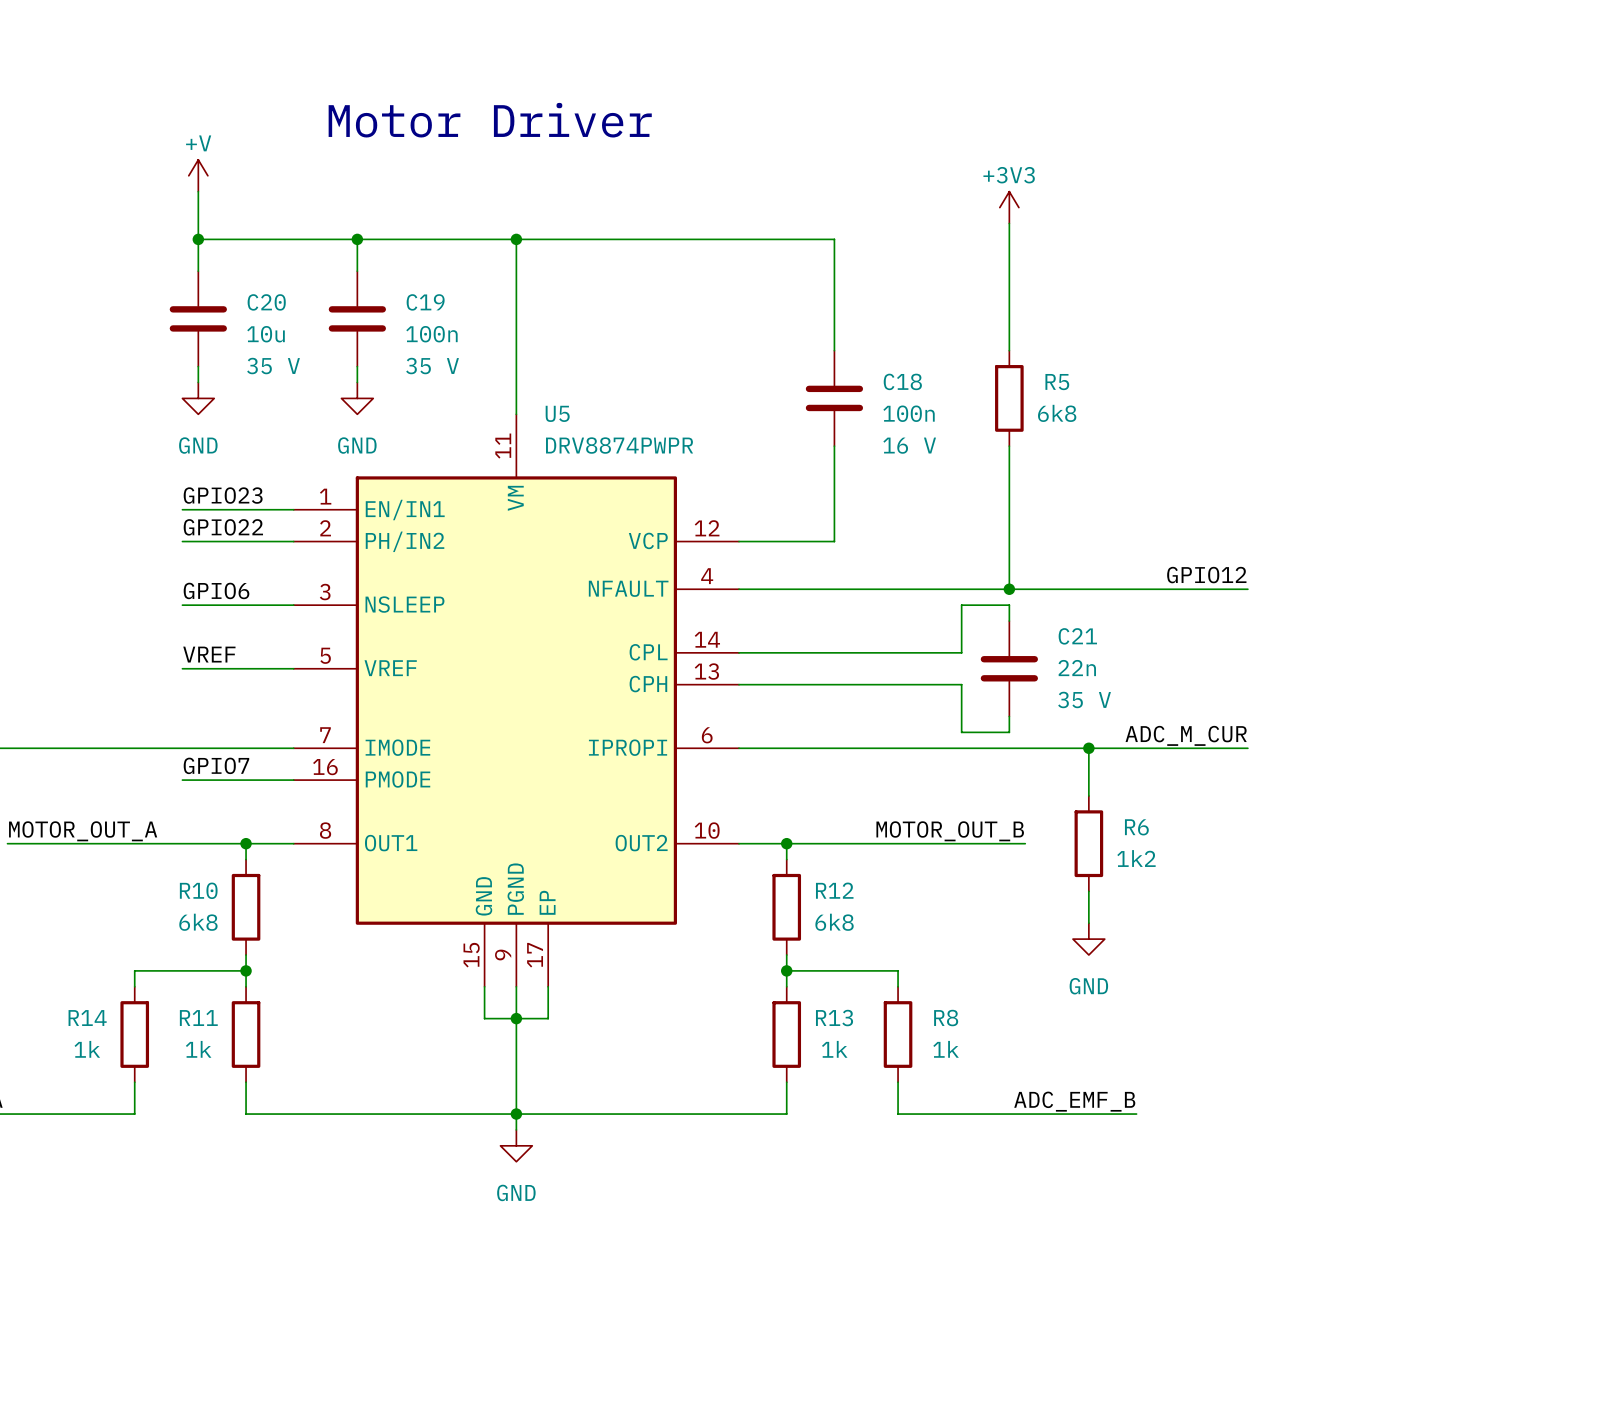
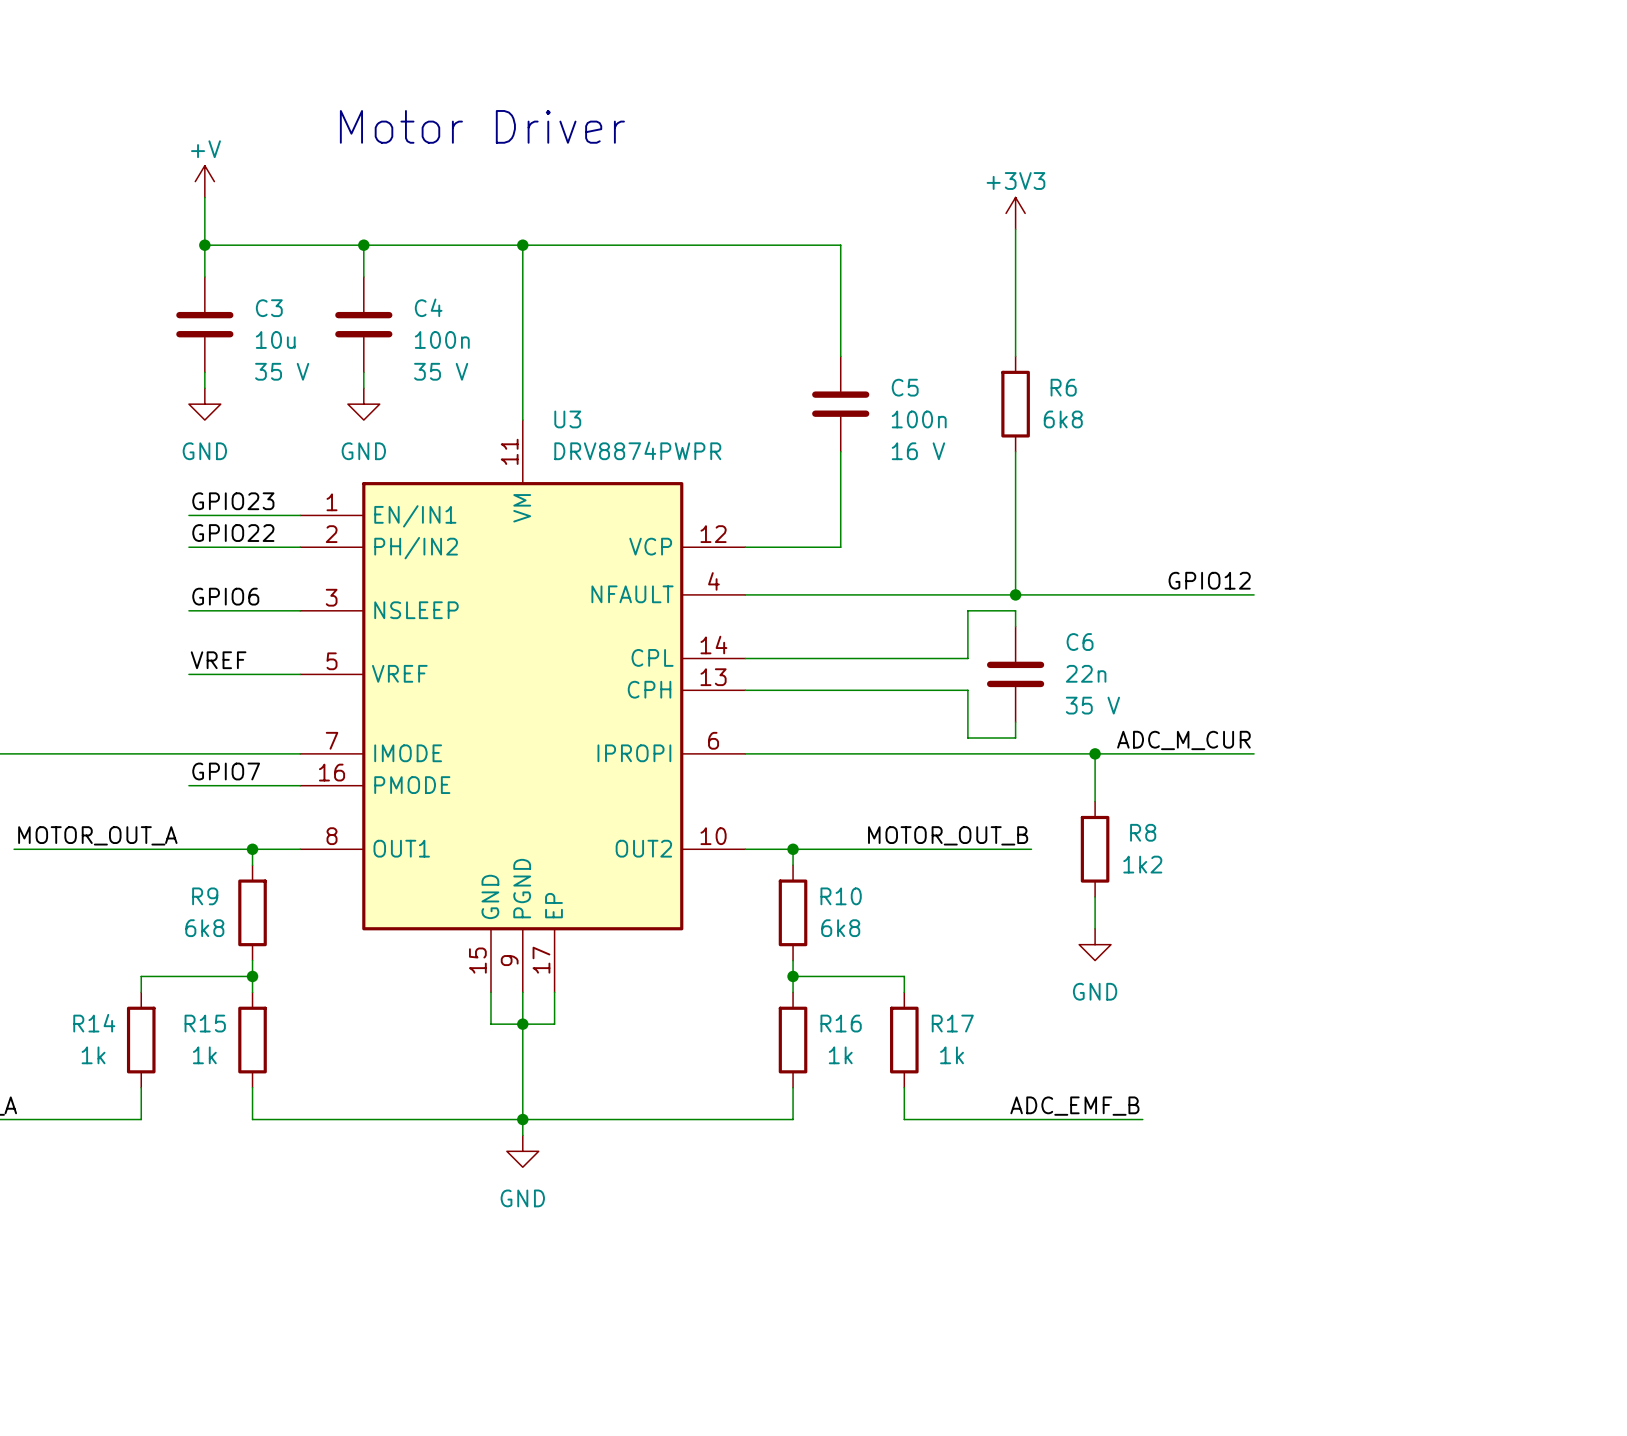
C20 name: C20 (266, 302) -> C3 (269, 308)
C19 name: C19 (425, 302) -> C4 (428, 307)
C18 name: C18 (902, 381) -> C5 (905, 387)
R5 name: R5 (1057, 382) -> R6 (1063, 387)
U5 name: U5 (557, 413) -> U3 (567, 419)
C21 name: C21 (1077, 636) -> C6 (1080, 642)
R6 name: R6 (1136, 827) -> R8 (1143, 832)
R10 name: R10 (198, 890) -> R9 (205, 896)
R12 name: R12 (834, 890) -> R10 (841, 896)
R11 name: R11 (198, 1018) -> R15 (205, 1023)
R13 name: R13 (834, 1018) -> R16 (841, 1023)
R8 name: R8 (946, 1018) -> R17 (952, 1023)

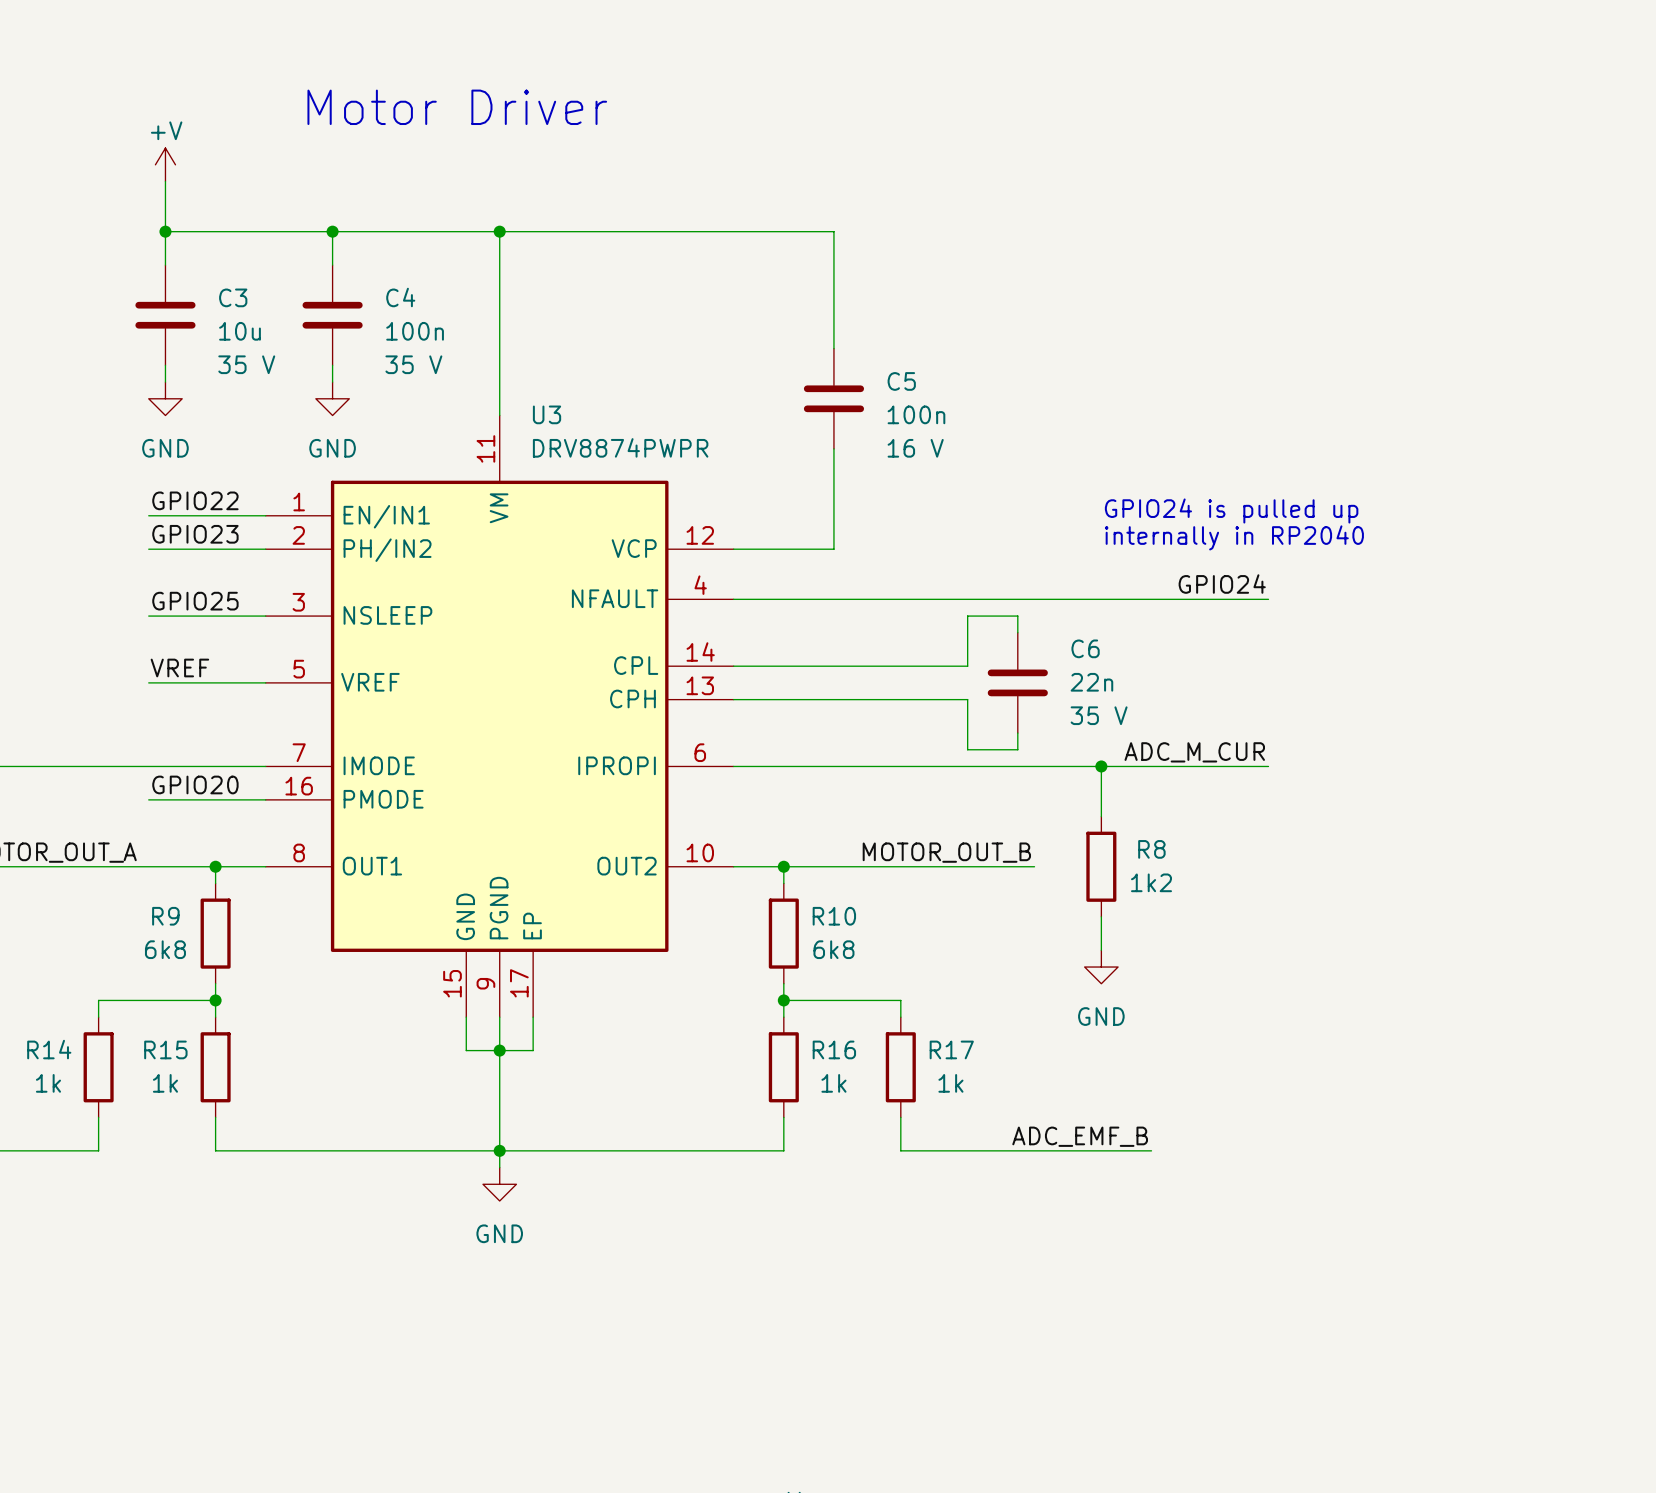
power symbol: +3V3 (1015, 213) -> none
wire: (1015, 229) (1015, 356) -> none
R6: 6k8 (1015, 404) -> none
wire: (1015, 451) (1015, 594) -> none
label: GPIO23 (233, 501) -> GPIO22 (195, 500)
text: none -> GPIO24 is pulled up (1231, 510)
label: GPIO22 (233, 533) -> GPIO23 (195, 534)
text: none -> internally in RP2040 (1234, 537)
label: GPIO12 (1209, 580) -> GPIO24 (1222, 584)
junction: (1015, 594) -> none
label: GPIO6 (225, 596) -> GPIO25 (195, 601)
label: GPIO7 (226, 771) -> GPIO20 (195, 784)

